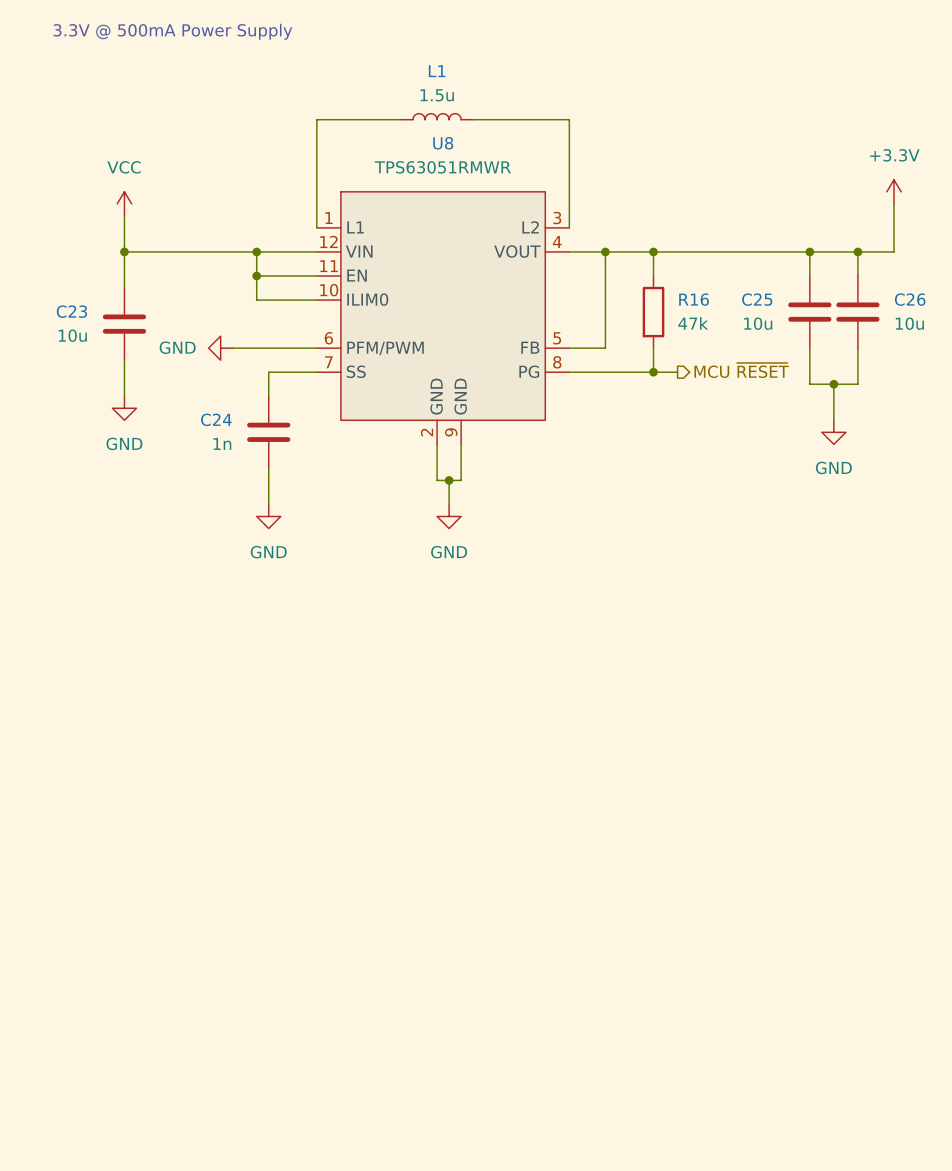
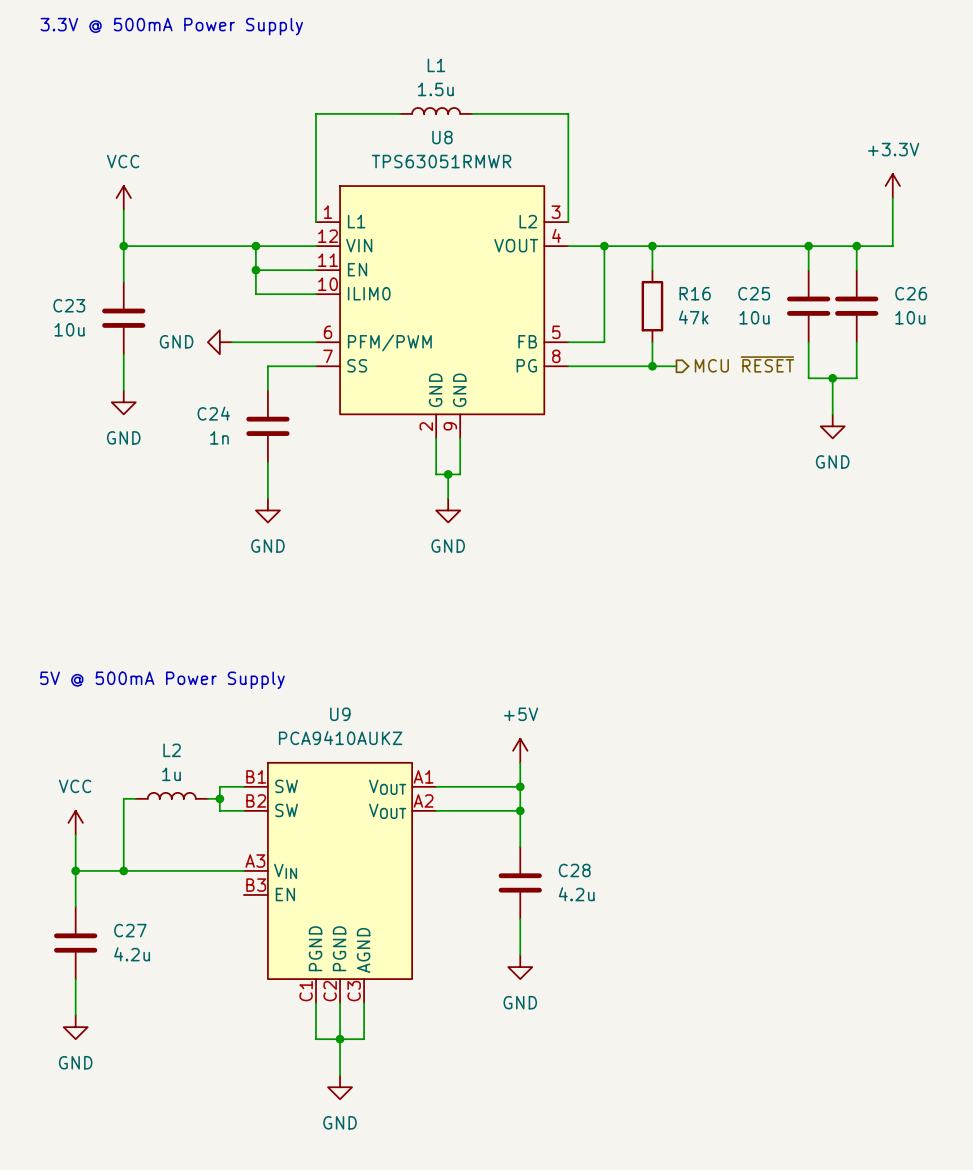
text: none -> 5V @ 500mA Power Supply (162, 680)
power symbol: none -> +5V (520, 750)
wire: none -> (520, 762) (520, 846)
wire: none -> (243, 786) (219, 786) (219, 810) (243, 810)
wire: none -> (436, 786) (520, 786)
junction: none -> (520, 786)
L2: none -> 1u (171, 795)
wire: none -> (135, 798) (123, 798) (123, 870)
wire: none -> (207, 798) (219, 798)
junction: none -> (219, 798)
wire: none -> (436, 810) (520, 810)
junction: none -> (520, 810)
power symbol: none -> VCC (75, 822)
wire: none -> (75, 834) (75, 906)
wire: none -> (75, 870) (243, 870)
junction: none -> (75, 870)
junction: none -> (123, 870)
U9: none -> PCA9410AUKZ (340, 882)
C28: none -> 4.2u (520, 882)
wire: none -> (520, 919) (520, 955)
C27: none -> 4.2u (75, 943)
power symbol: none -> GND (520, 967)
wire: none -> (75, 979) (75, 1015)
wire: none -> (315, 1003) (315, 1039) (364, 1039) (364, 1003)
wire: none -> (340, 1003) (340, 1075)
power symbol: none -> GND (75, 1027)
junction: none -> (340, 1039)
power symbol: none -> GND (340, 1087)

